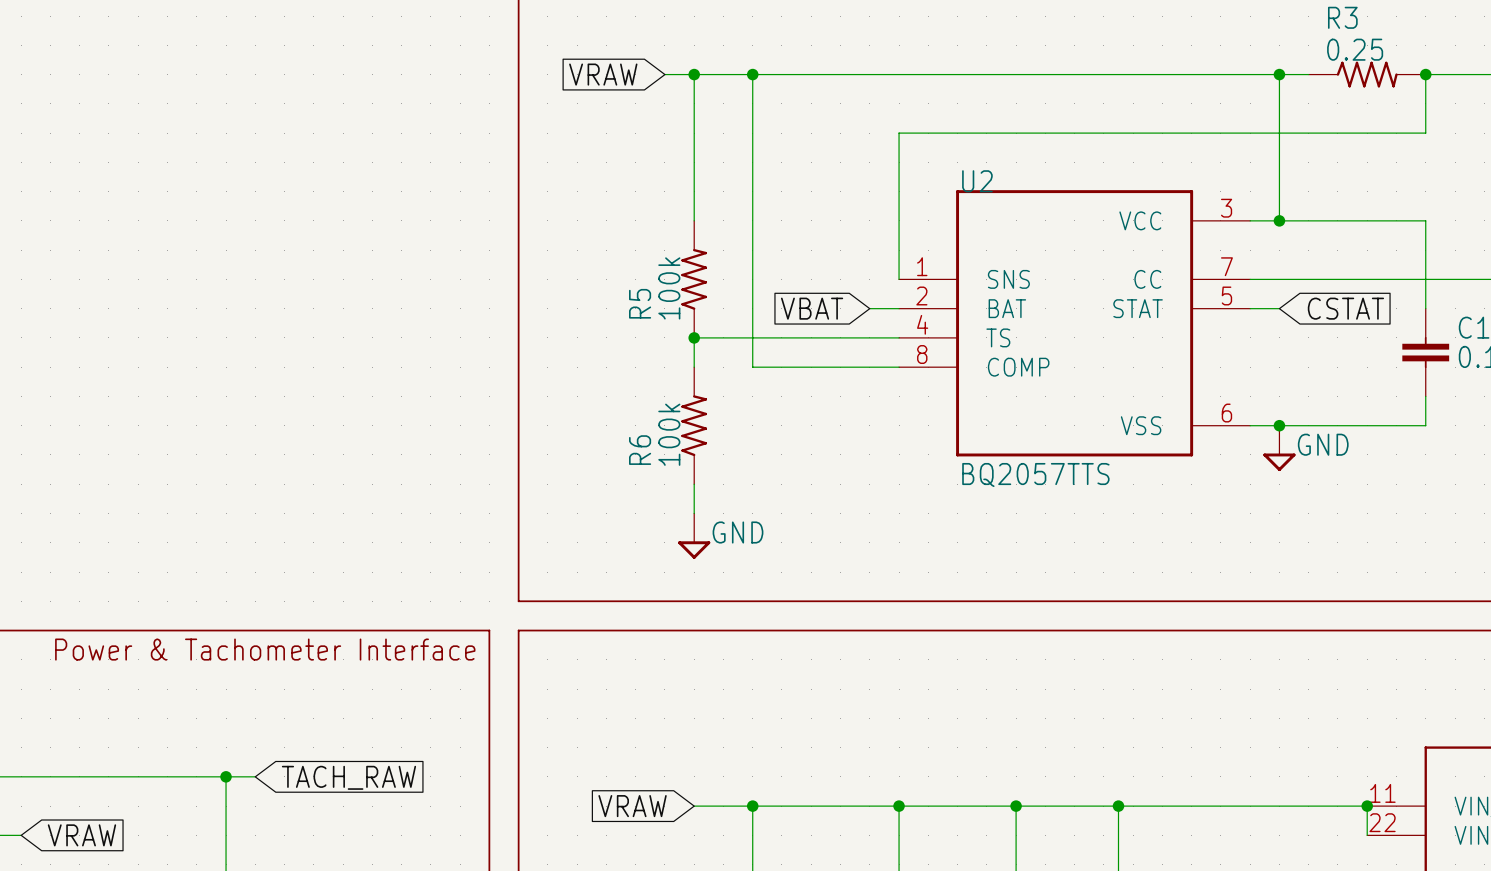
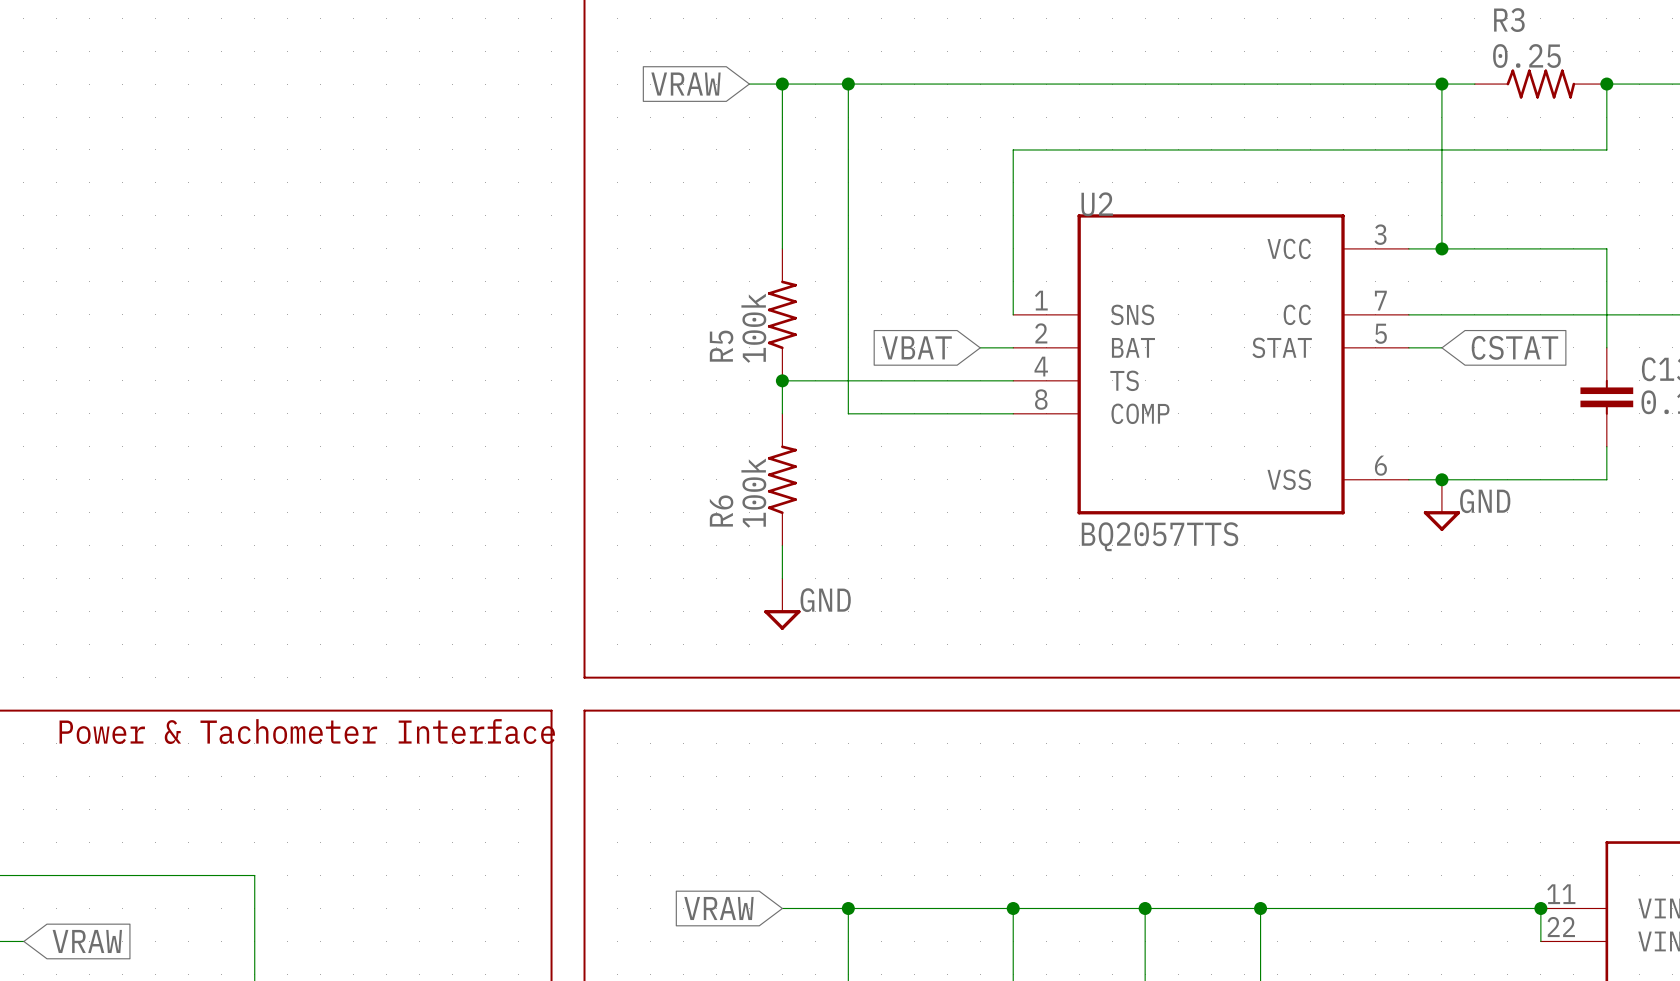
wire: (226, 776) (255, 776) -> none
junction: (226, 776) -> none
global label: TACH_RAW (348, 777) -> none

